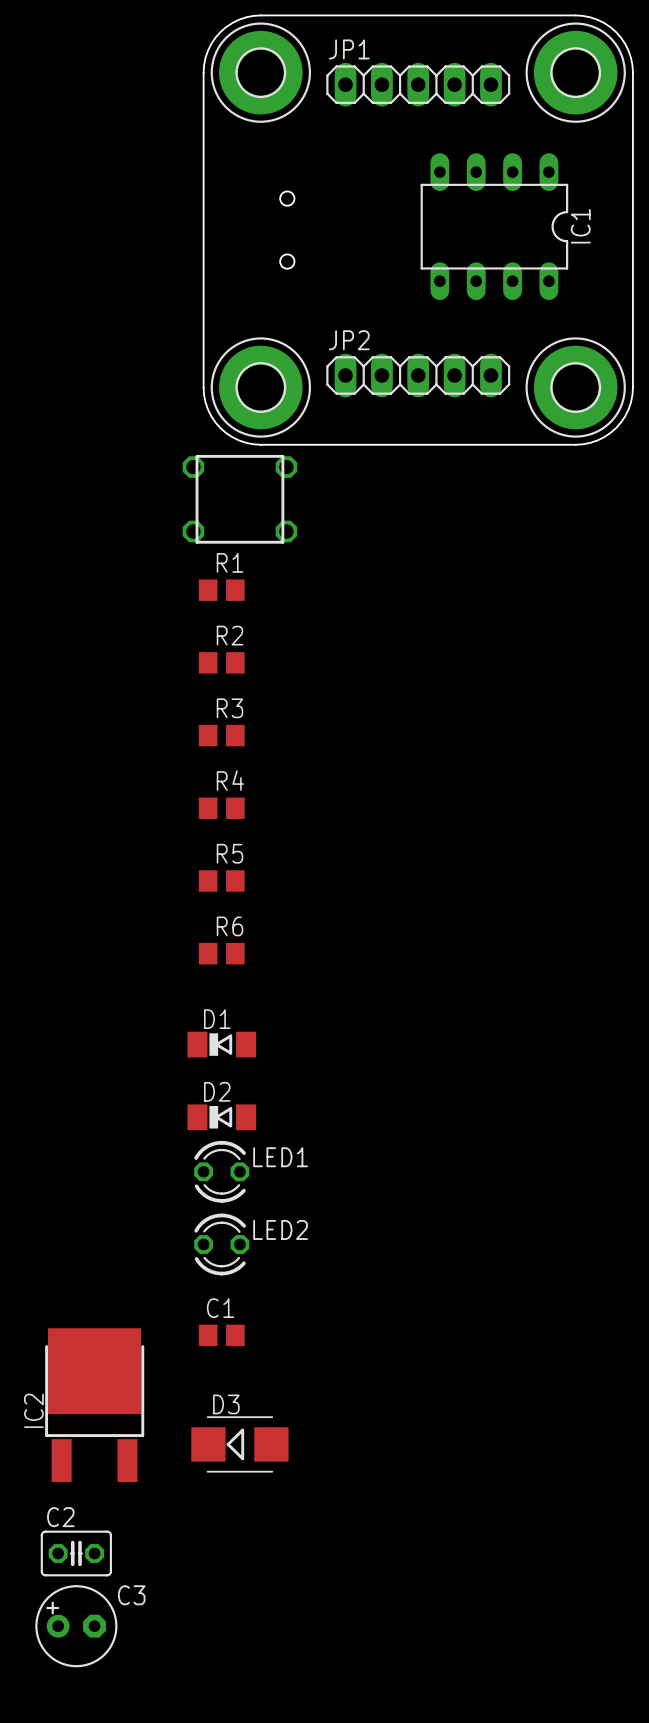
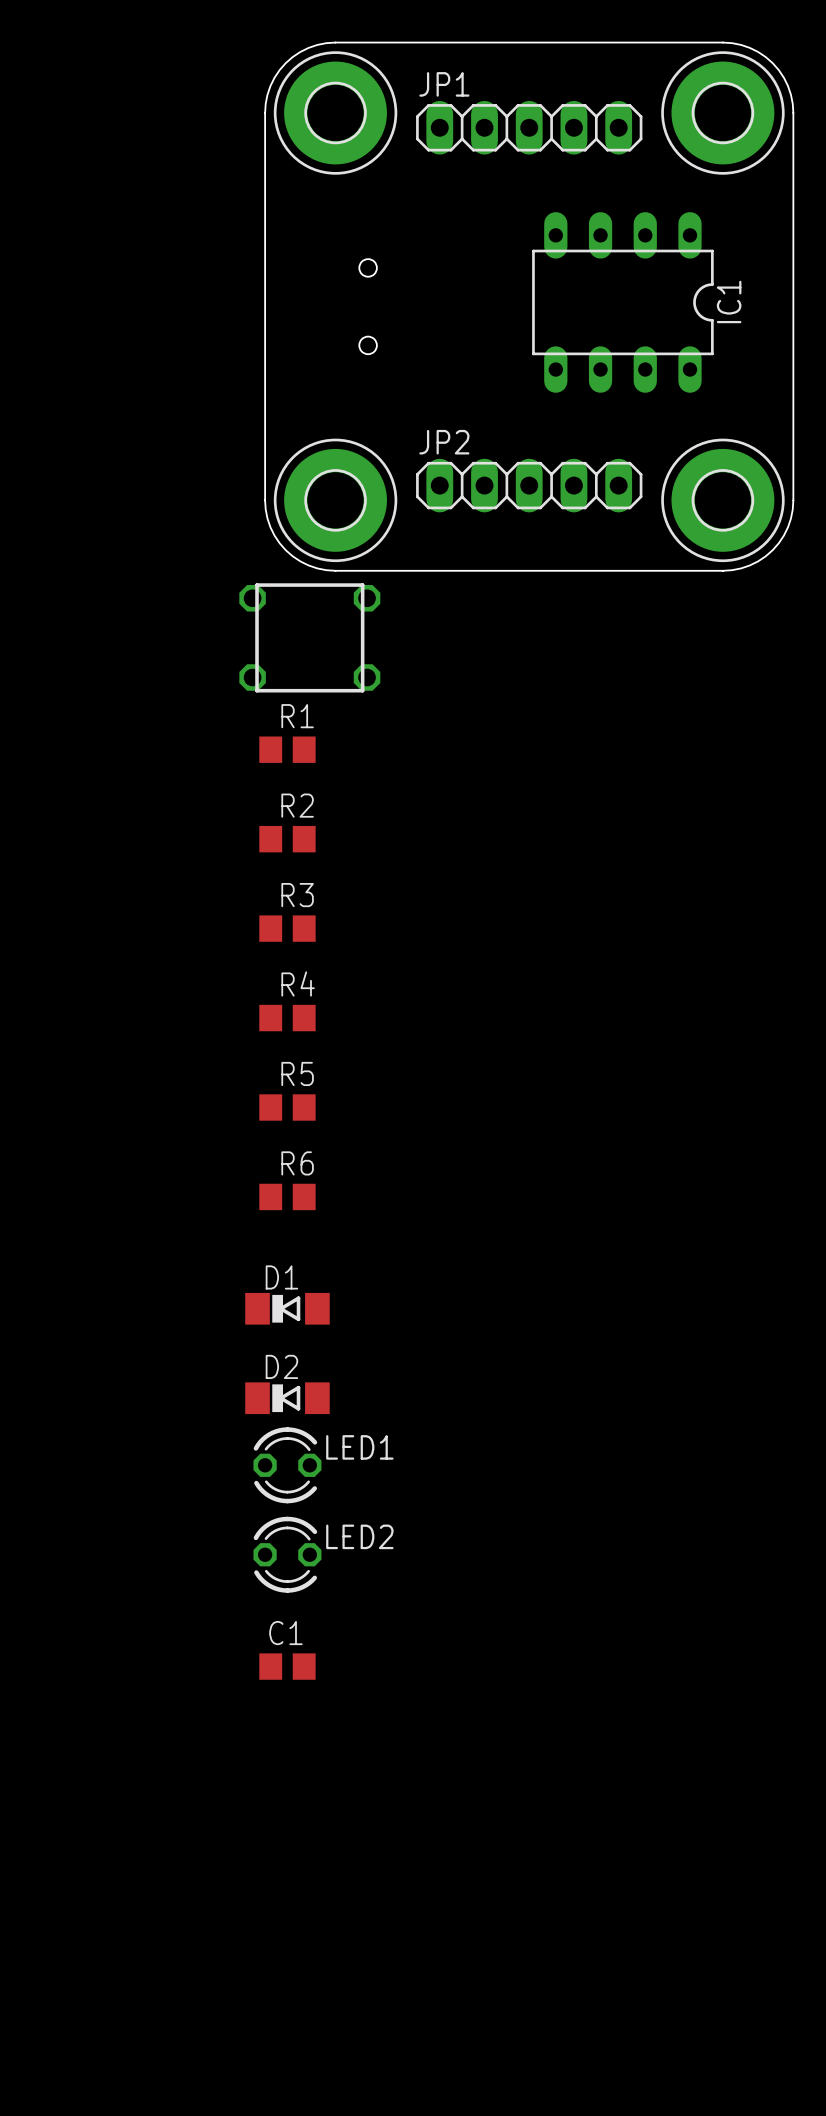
IC2: (94, 1405) -> none
D3: (239, 1444) -> none
C2: (76, 1553) -> none
C3: (76, 1626) -> none

